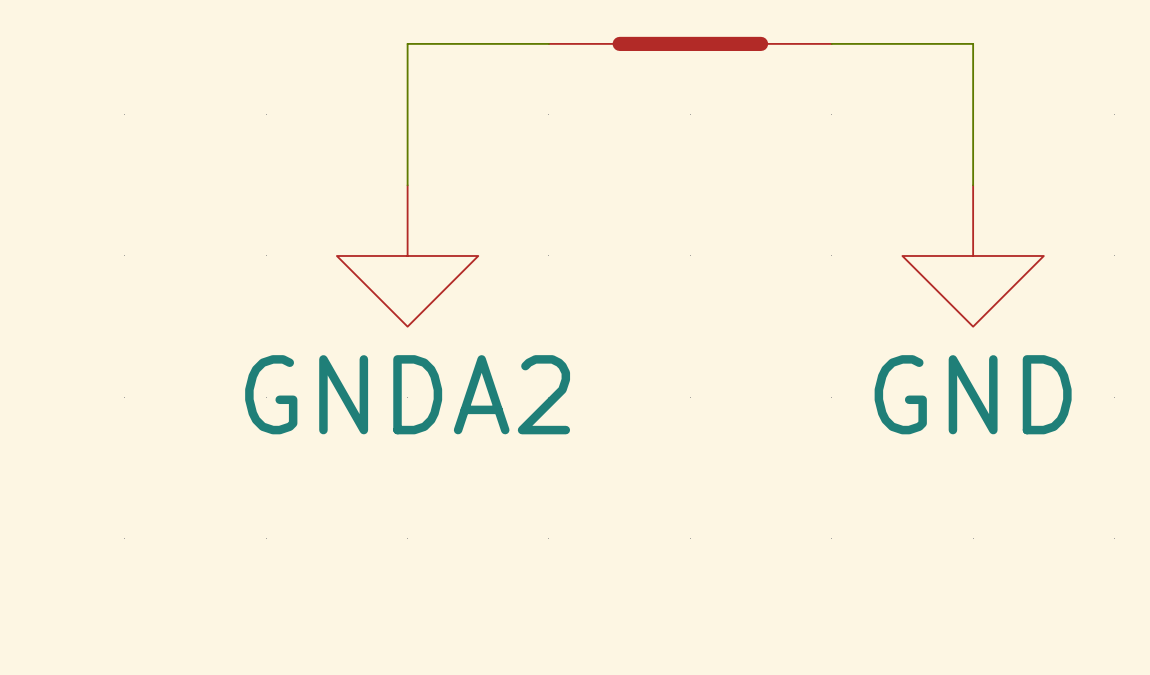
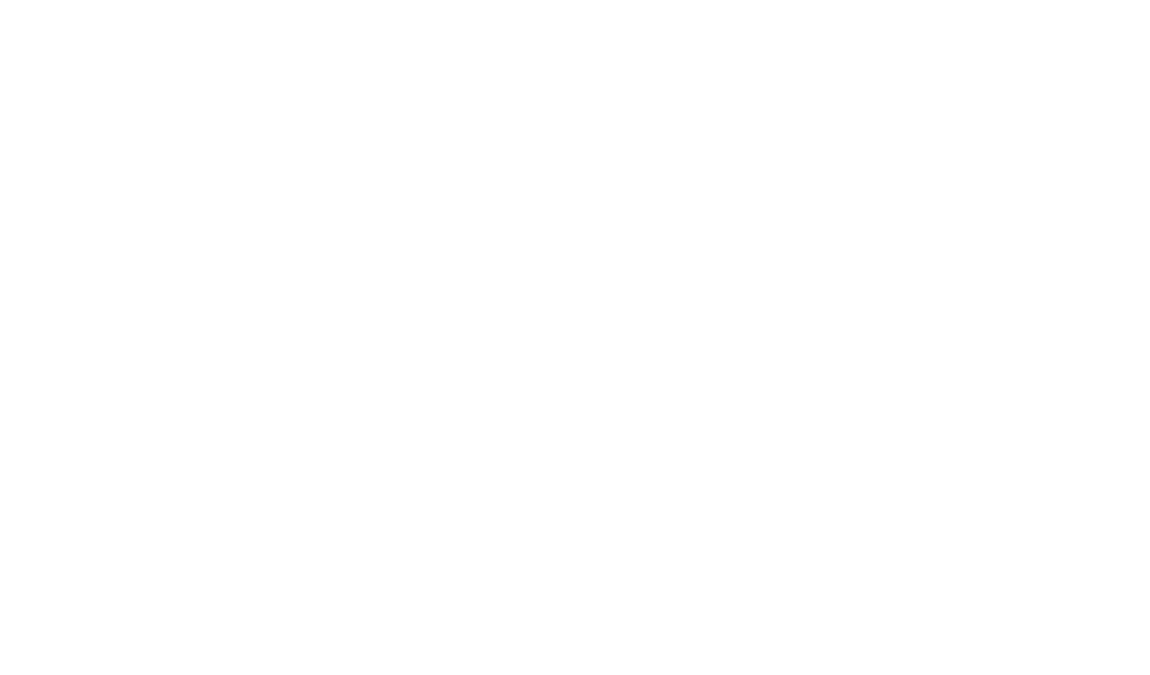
wire: (548, 43) (407, 43) (407, 185) -> none
part: (690, 43) -> none
wire: (831, 43) (973, 43) (973, 185) -> none
power symbol: GNDA2 (407, 255) -> none
power symbol: GND (973, 255) -> none

